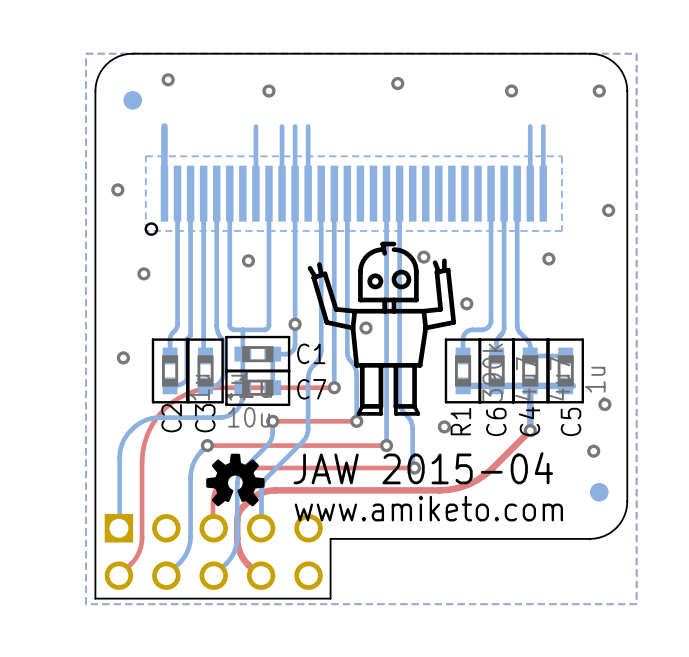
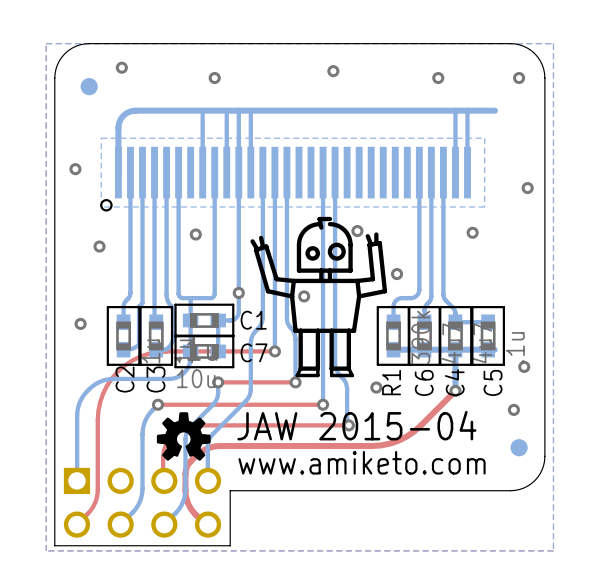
bottom track: (164, 126) (164, 145) -> (495, 110) (135, 110) (123, 115) (118, 127)
board edge: (330, 538) (330, 598) (285, 598) -> (271, 490) (230, 490) (230, 545)
part: none -> (142, 502)
part: (213, 551) -> none

